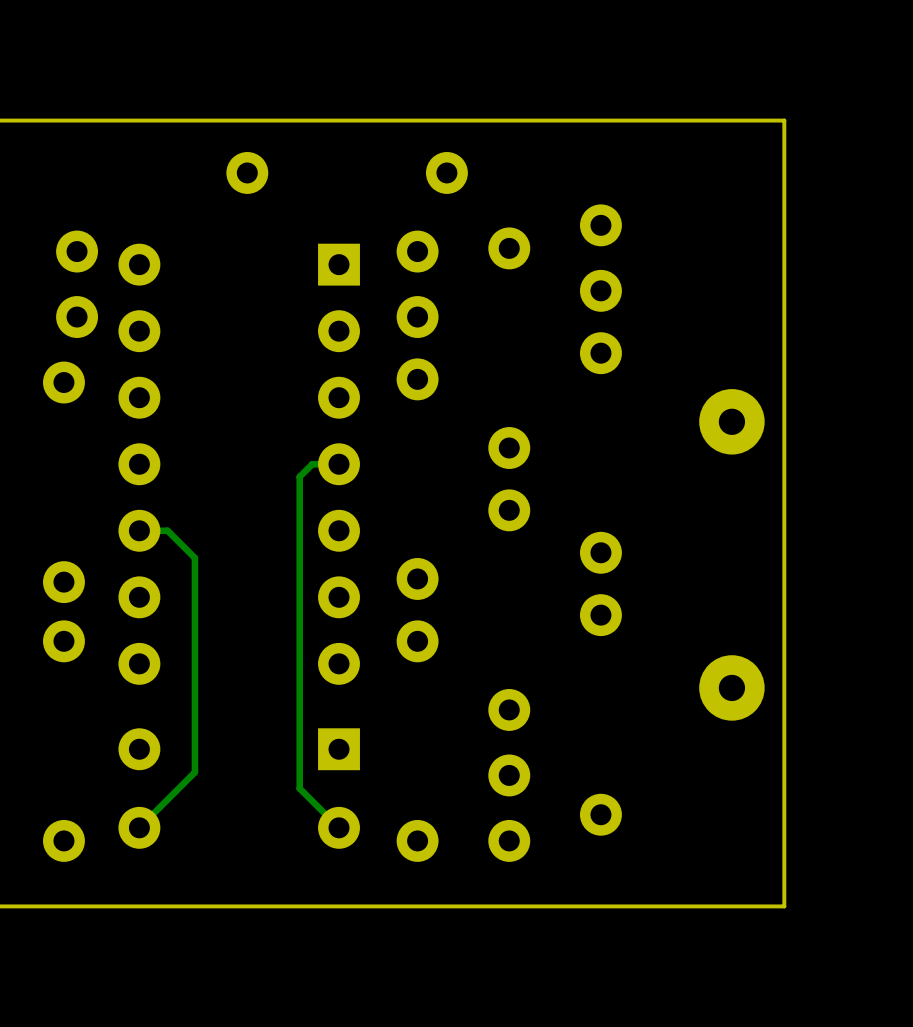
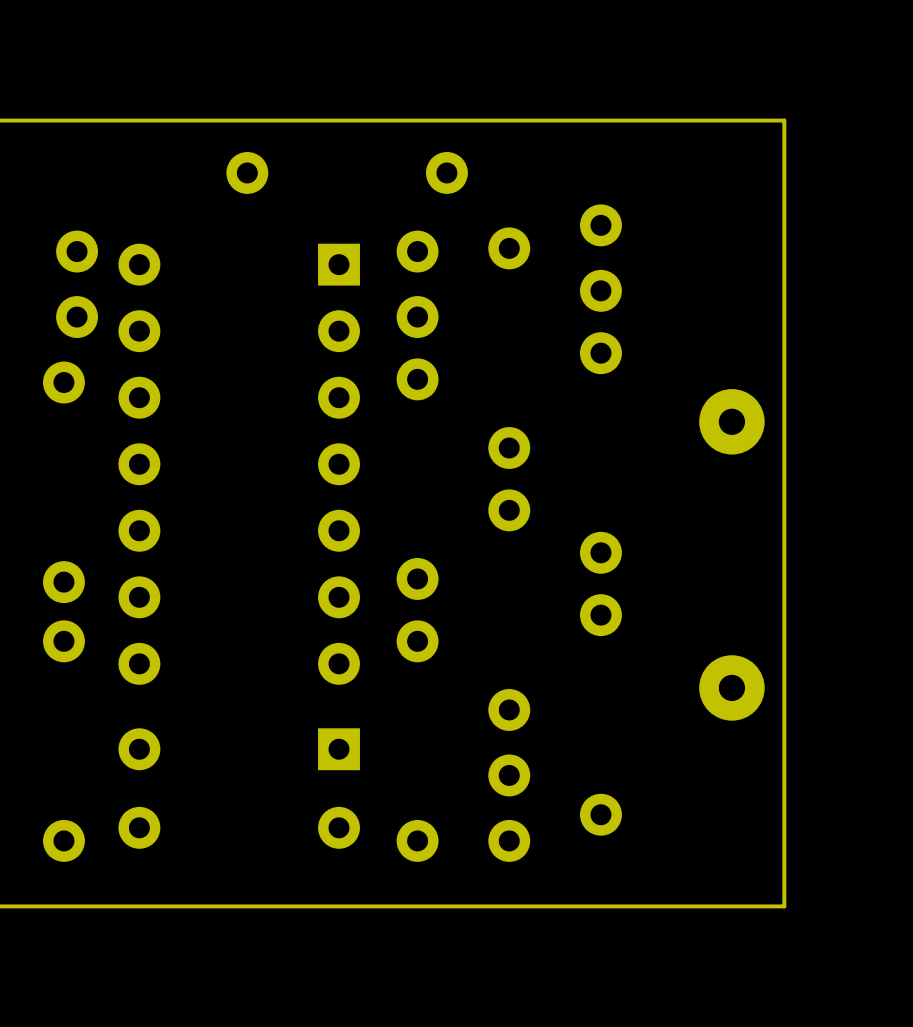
track: (339, 464) (312, 464) (299, 476) (299, 788) (339, 827) -> none
track: (139, 530) (167, 530) (194, 558) (194, 772) (139, 827) -> none

